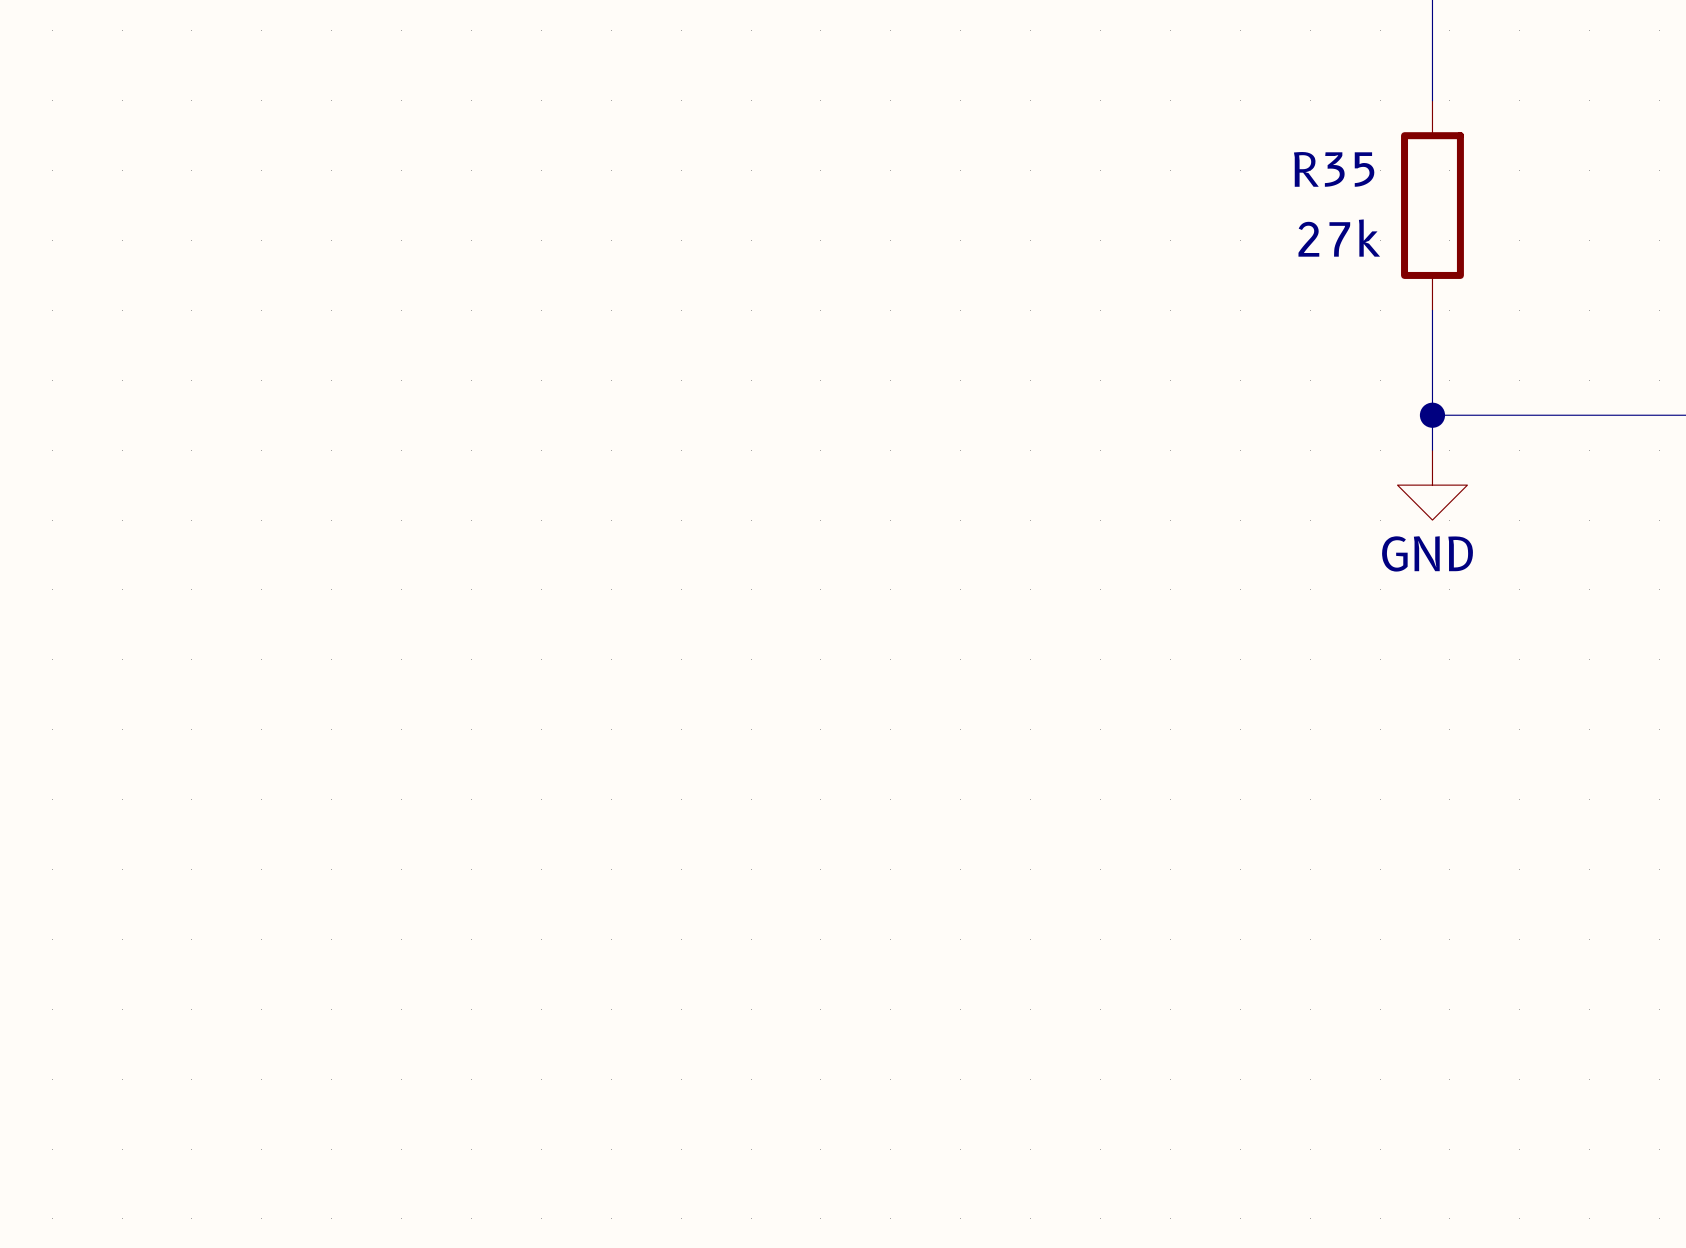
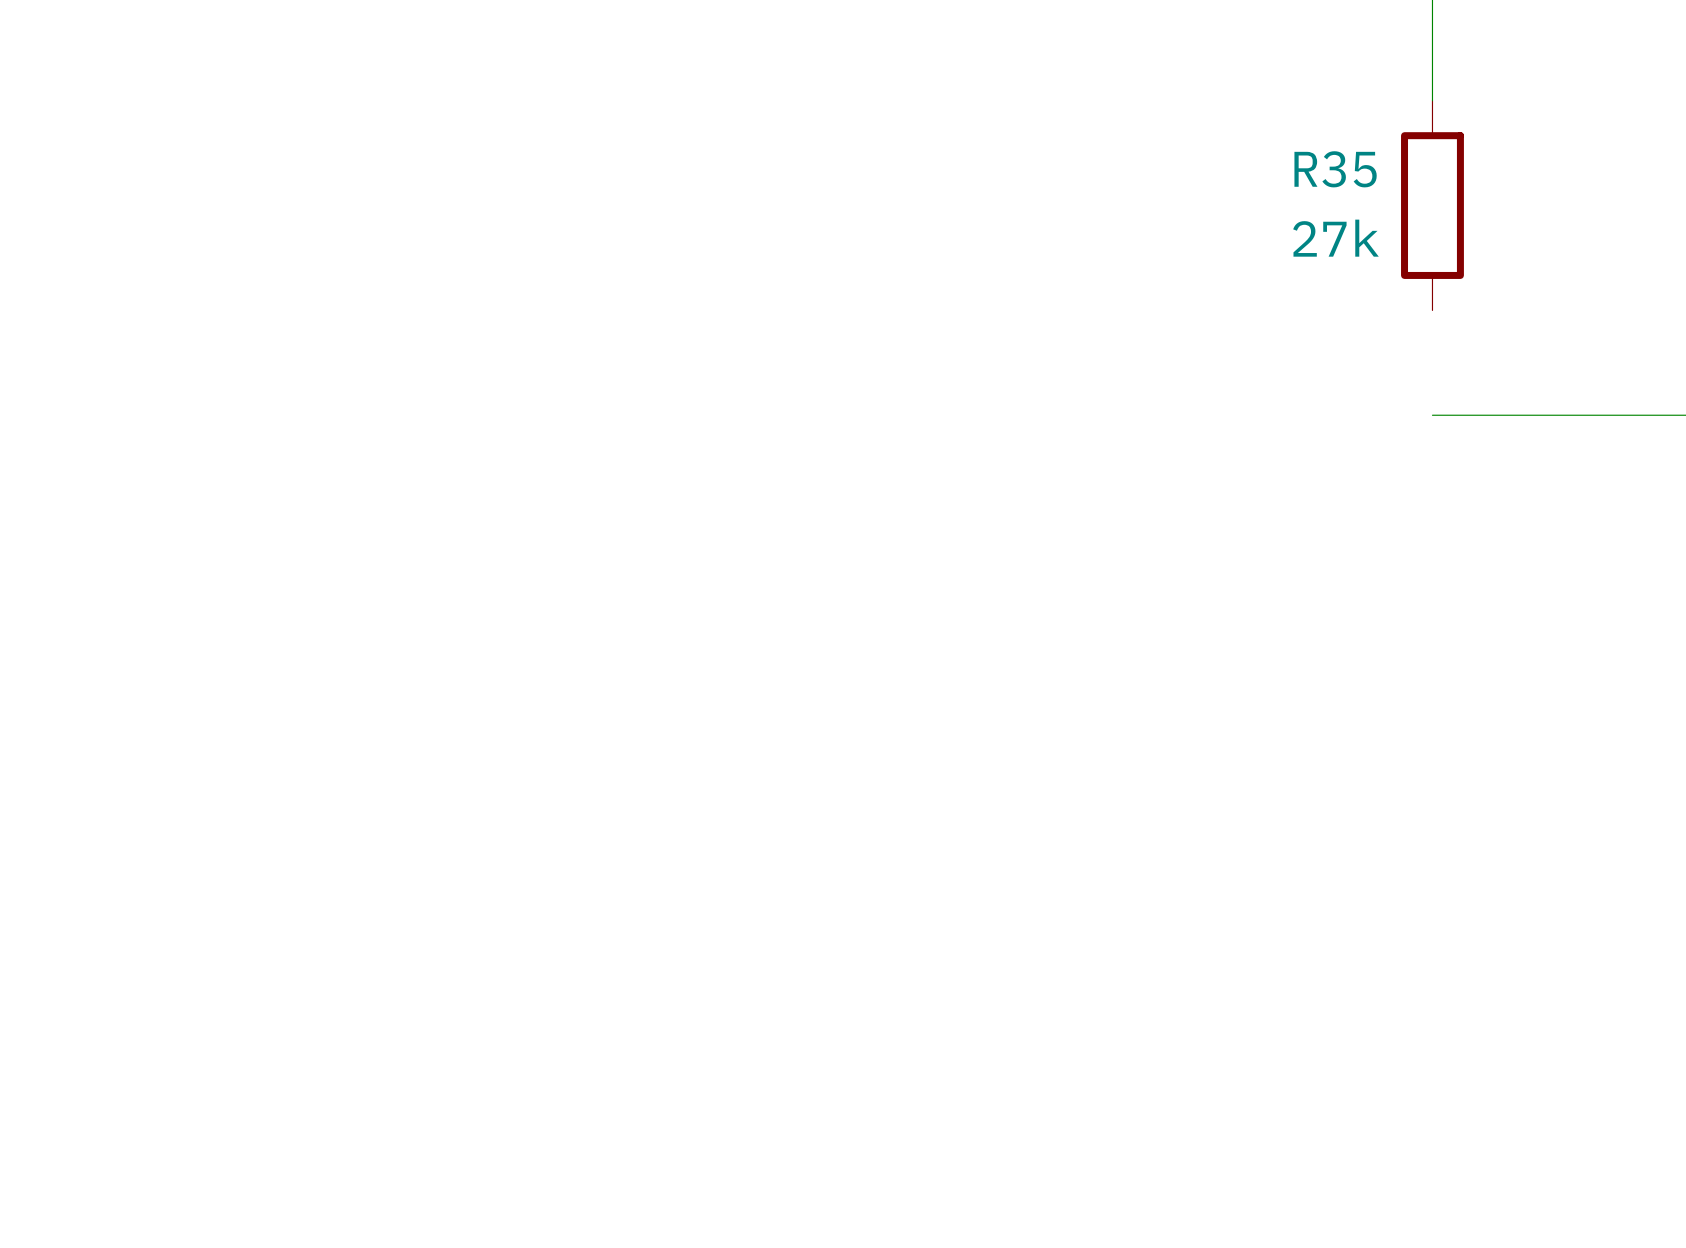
wire: (1432, 310) (1432, 450) -> none
junction: (1432, 415) -> none
power symbol: GND (1432, 485) -> none

